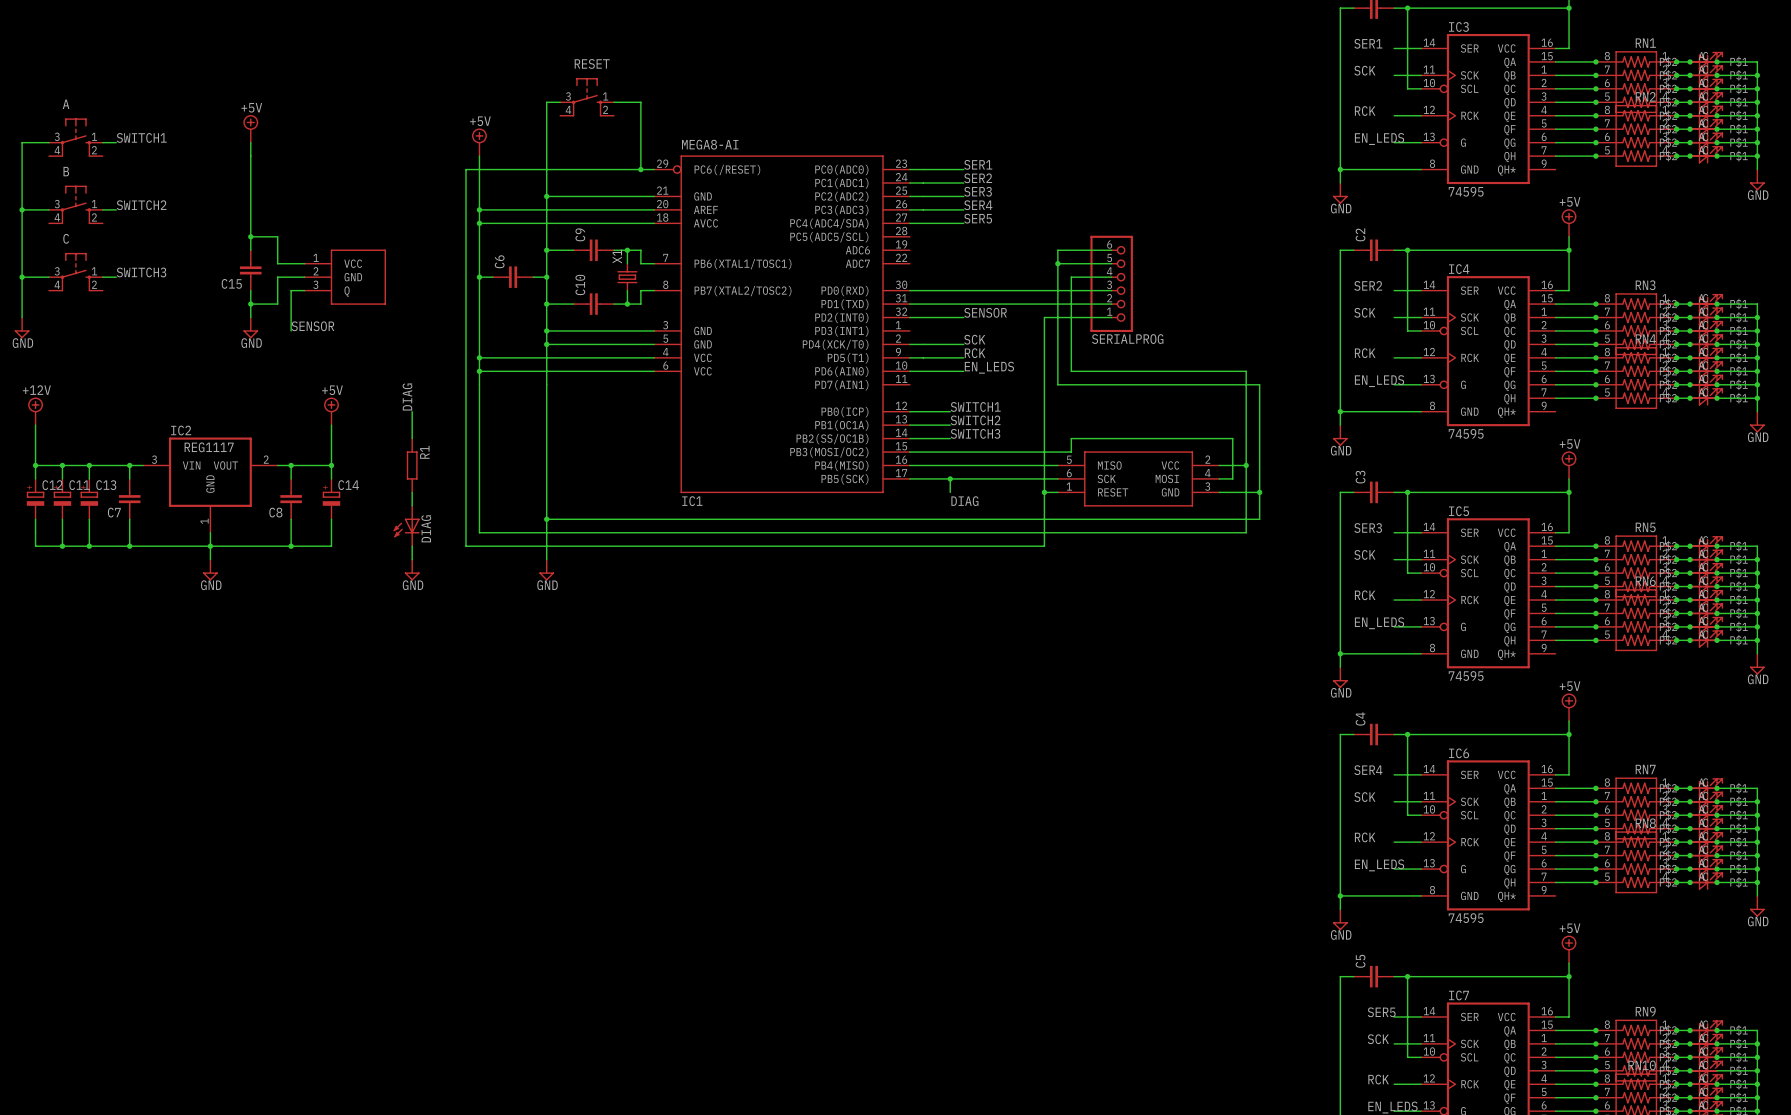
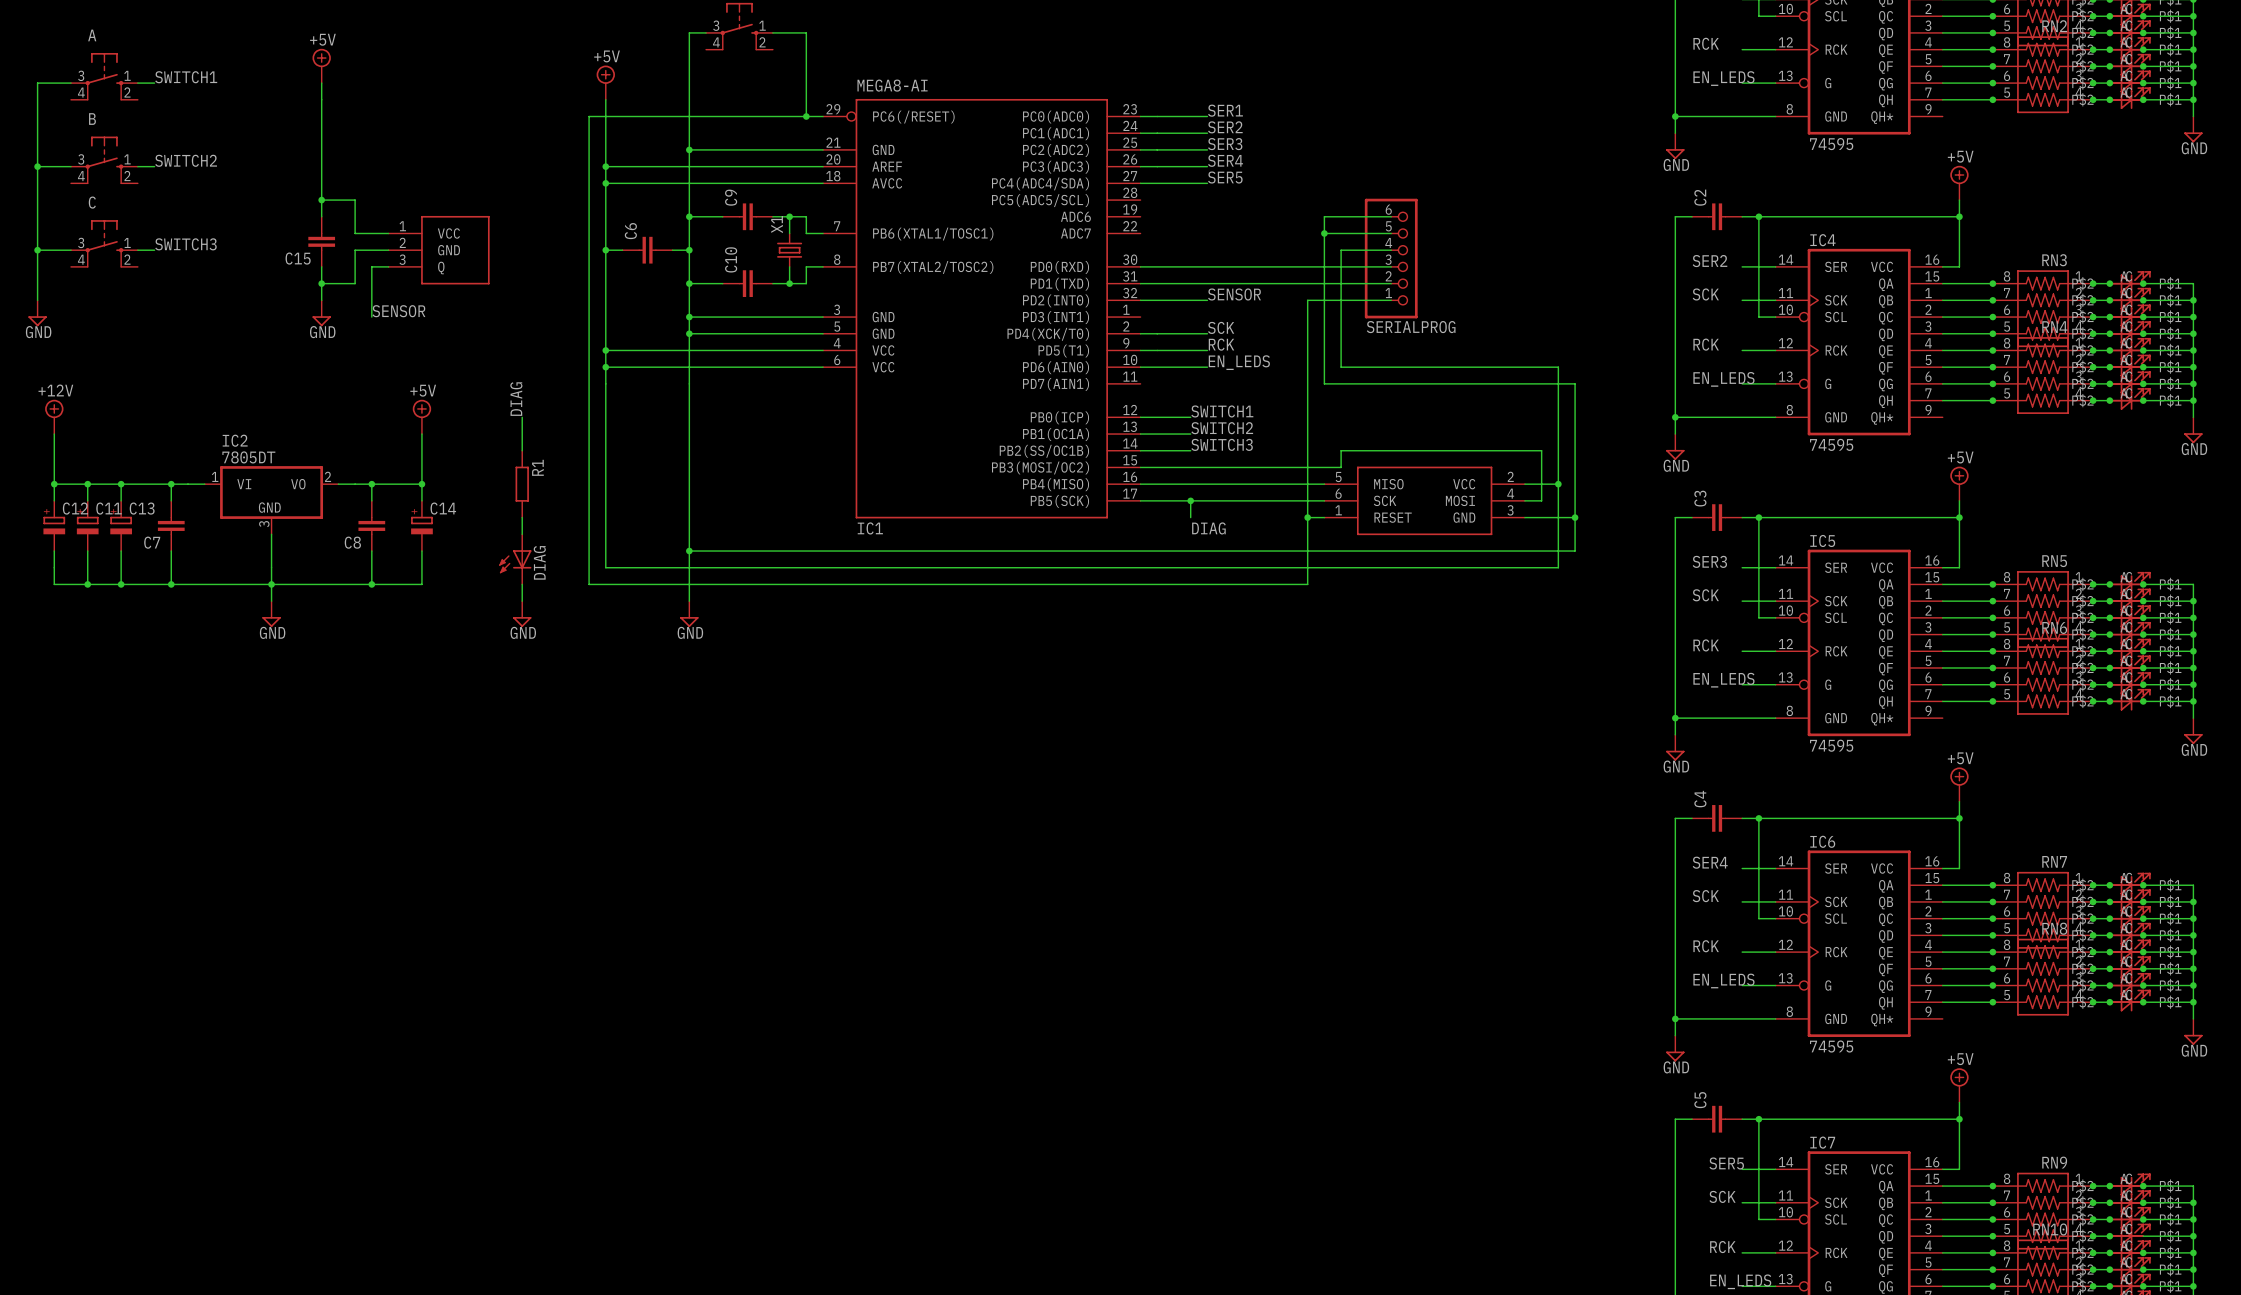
IC2 symbol: [143, 437, 278, 533] -> [204, 466, 339, 535]
IC2 value: REG1117 (209, 447) -> 7805DT (248, 457)

